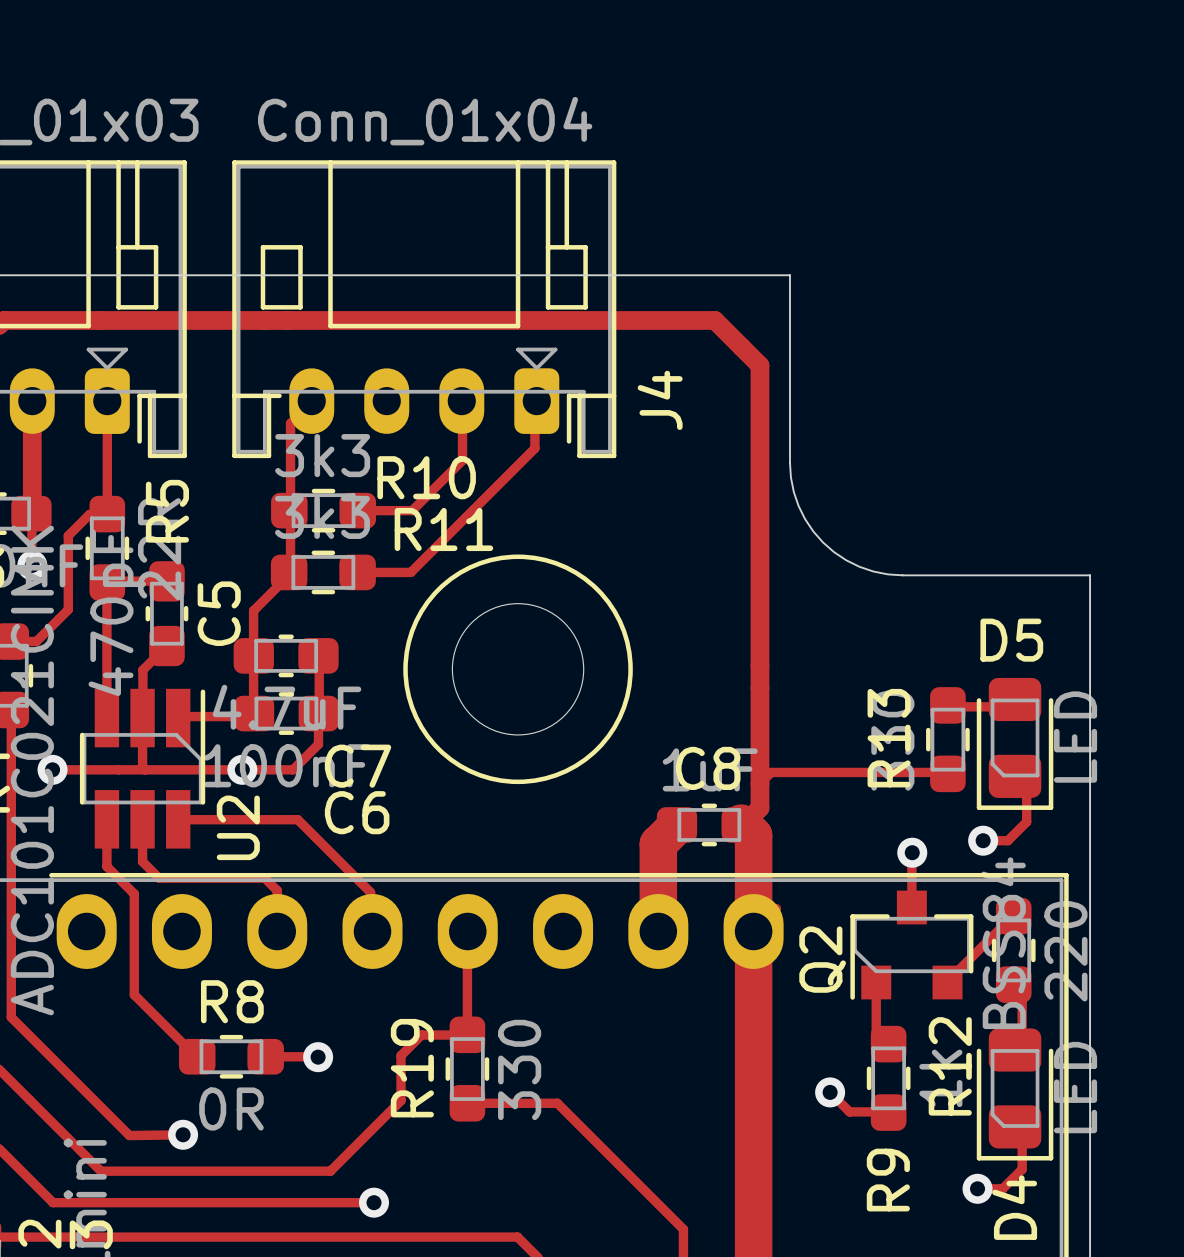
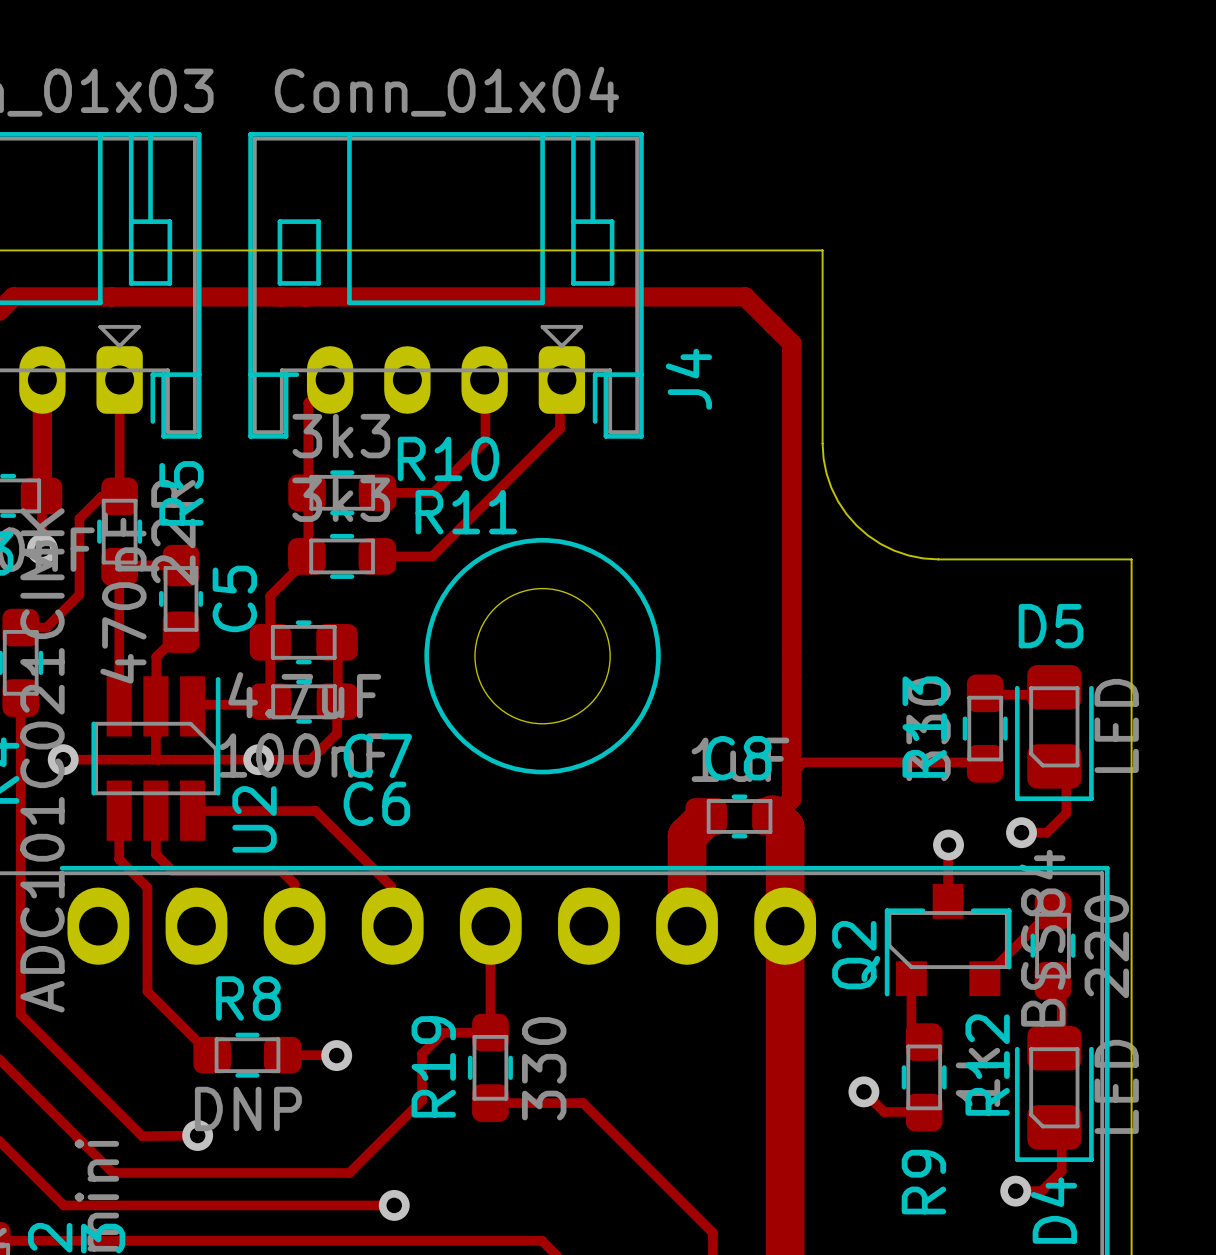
R8 value: 0R (231, 1109) -> DNP (248, 1108)

